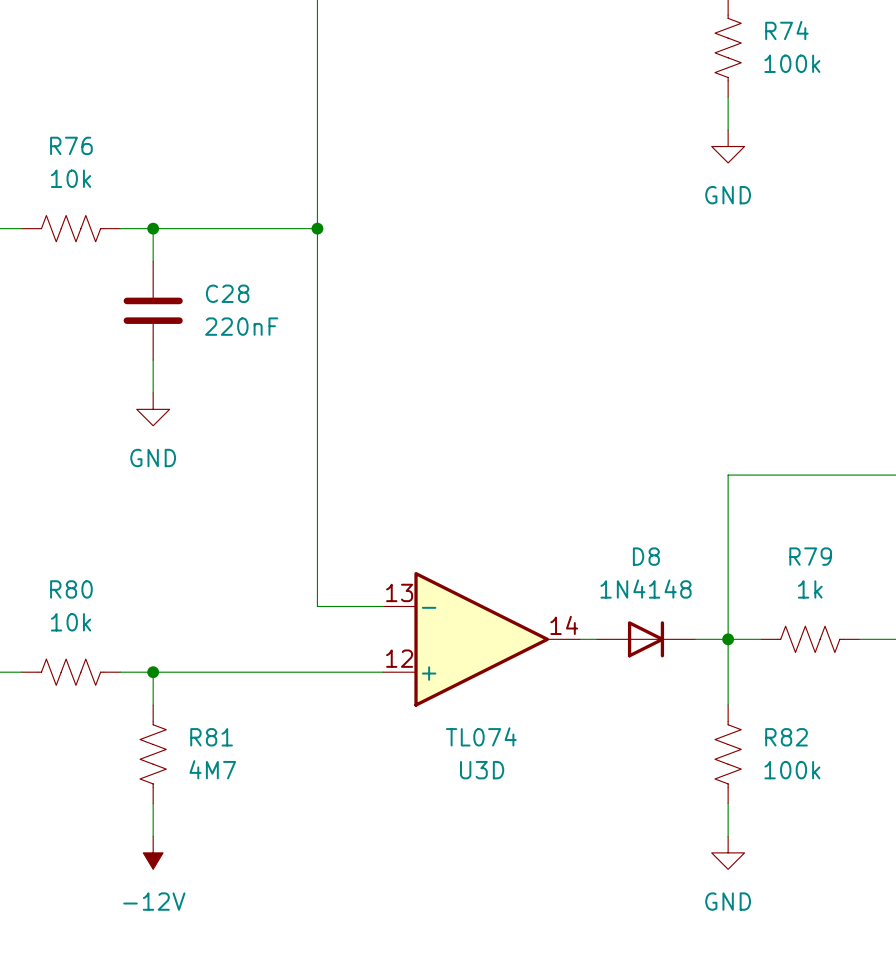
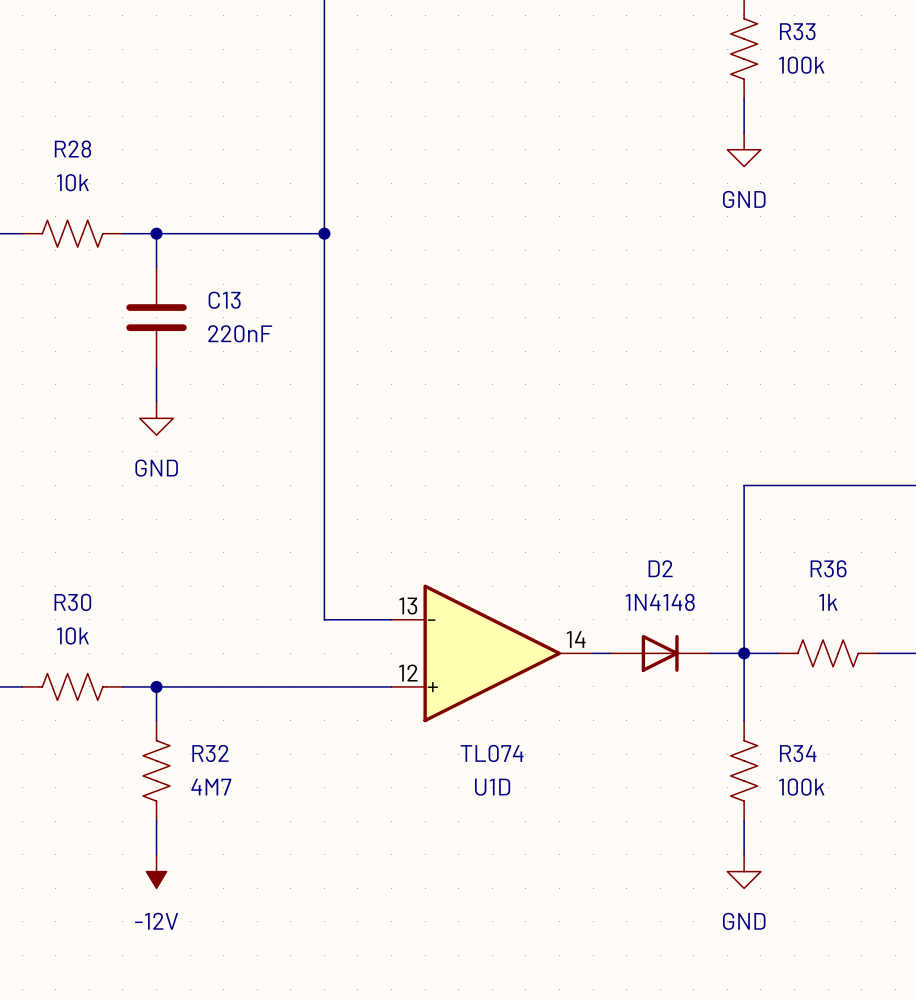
R74 name: R74 (786, 30) -> R33 (797, 31)
R76 name: R76 (71, 145) -> R28 (72, 149)
C28 name: C28 (227, 293) -> C13 (224, 300)
D8 name: D8 (646, 556) -> D2 (660, 568)
R79 name: R79 (810, 556) -> R36 (828, 568)
R80 name: R80 (71, 589) -> R30 (72, 602)
R81 name: R81 (211, 737) -> R32 (210, 753)
R82 name: R82 (786, 737) -> R34 (798, 753)
U3D name: U3D (482, 770) -> U1D (492, 787)

